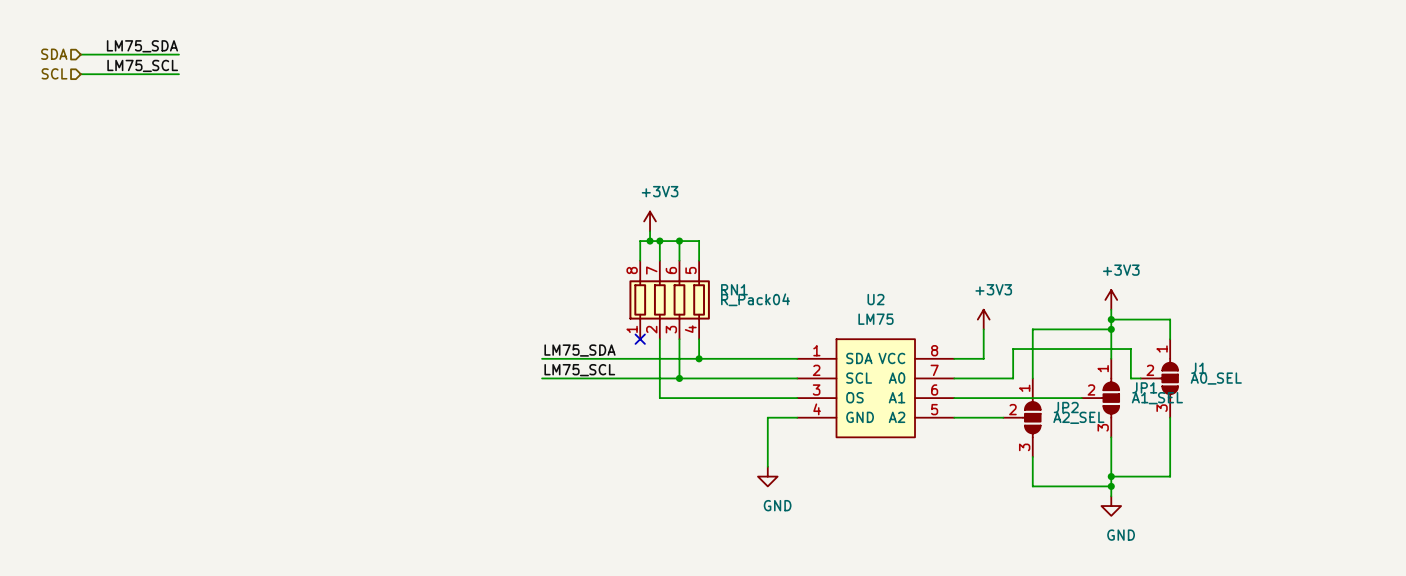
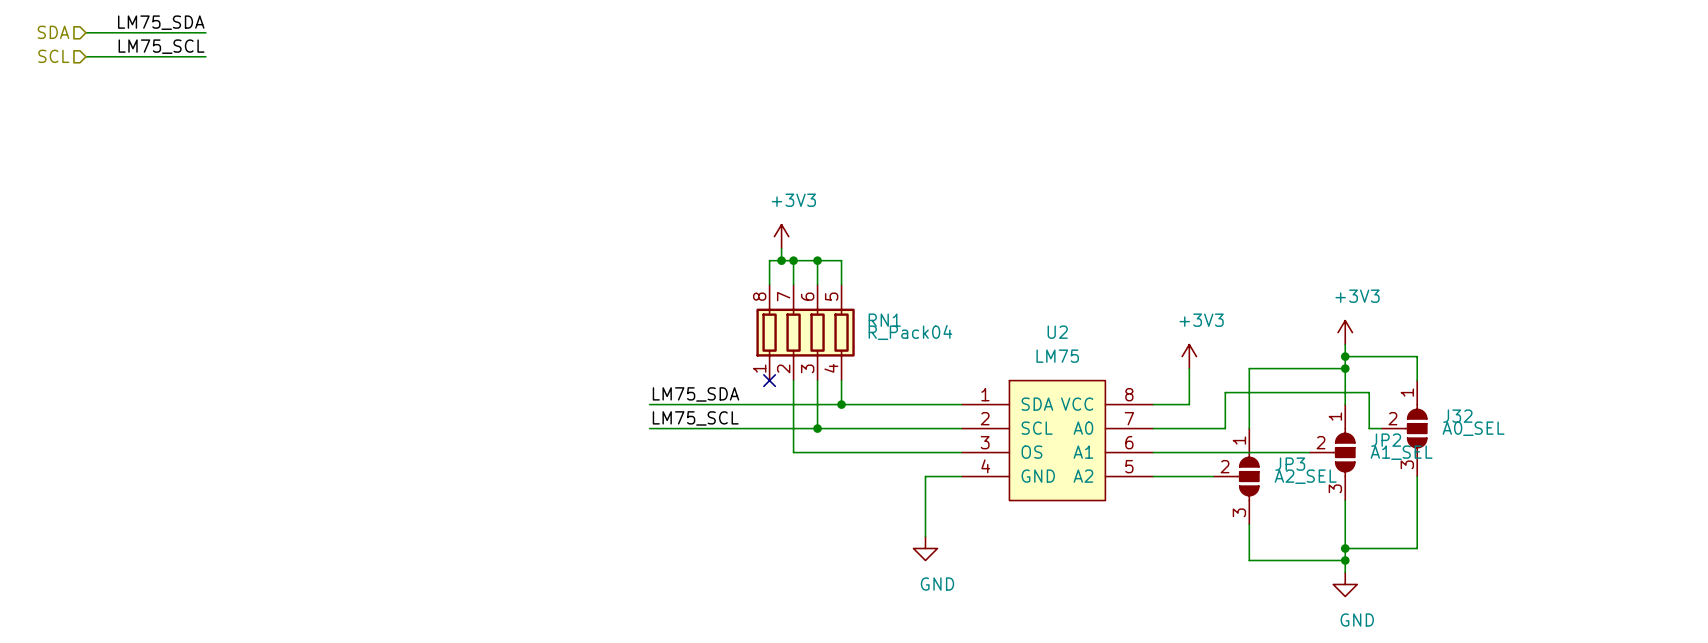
J1 name: J1 (1198, 368) -> J32 (1457, 416)
JP1 name: JP1 (1144, 387) -> JP2 (1386, 440)
JP2 name: JP2 (1066, 407) -> JP3 (1290, 464)

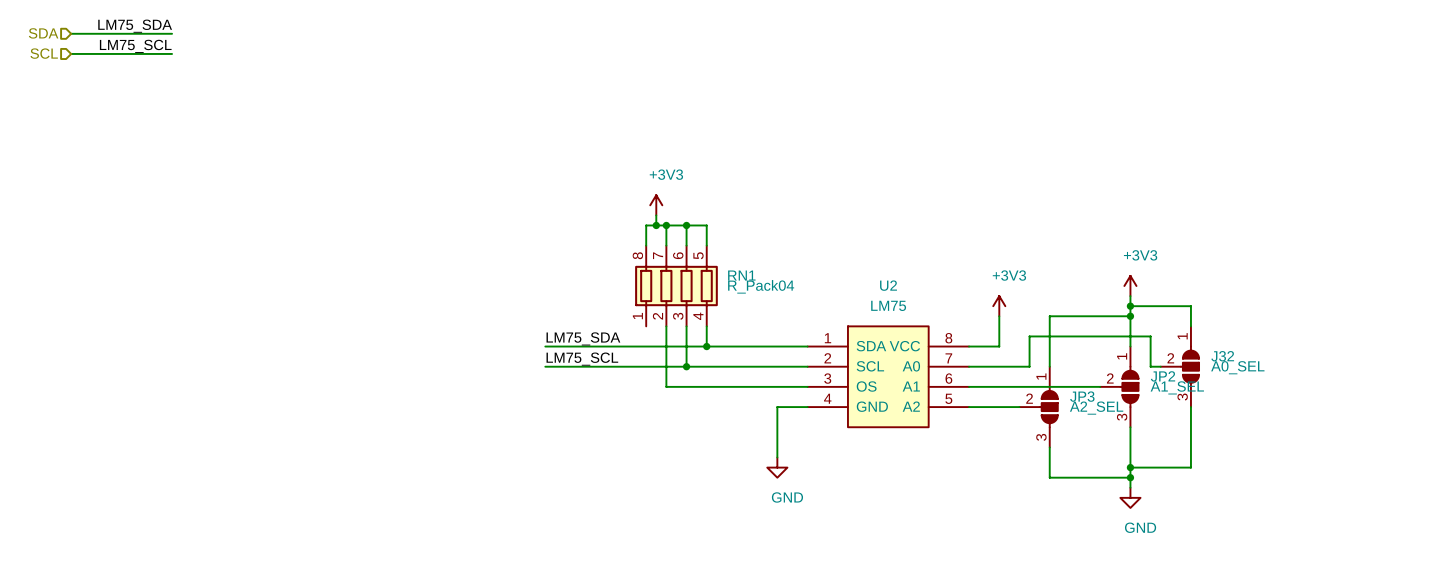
no-connect mark: (769, 380) -> none

